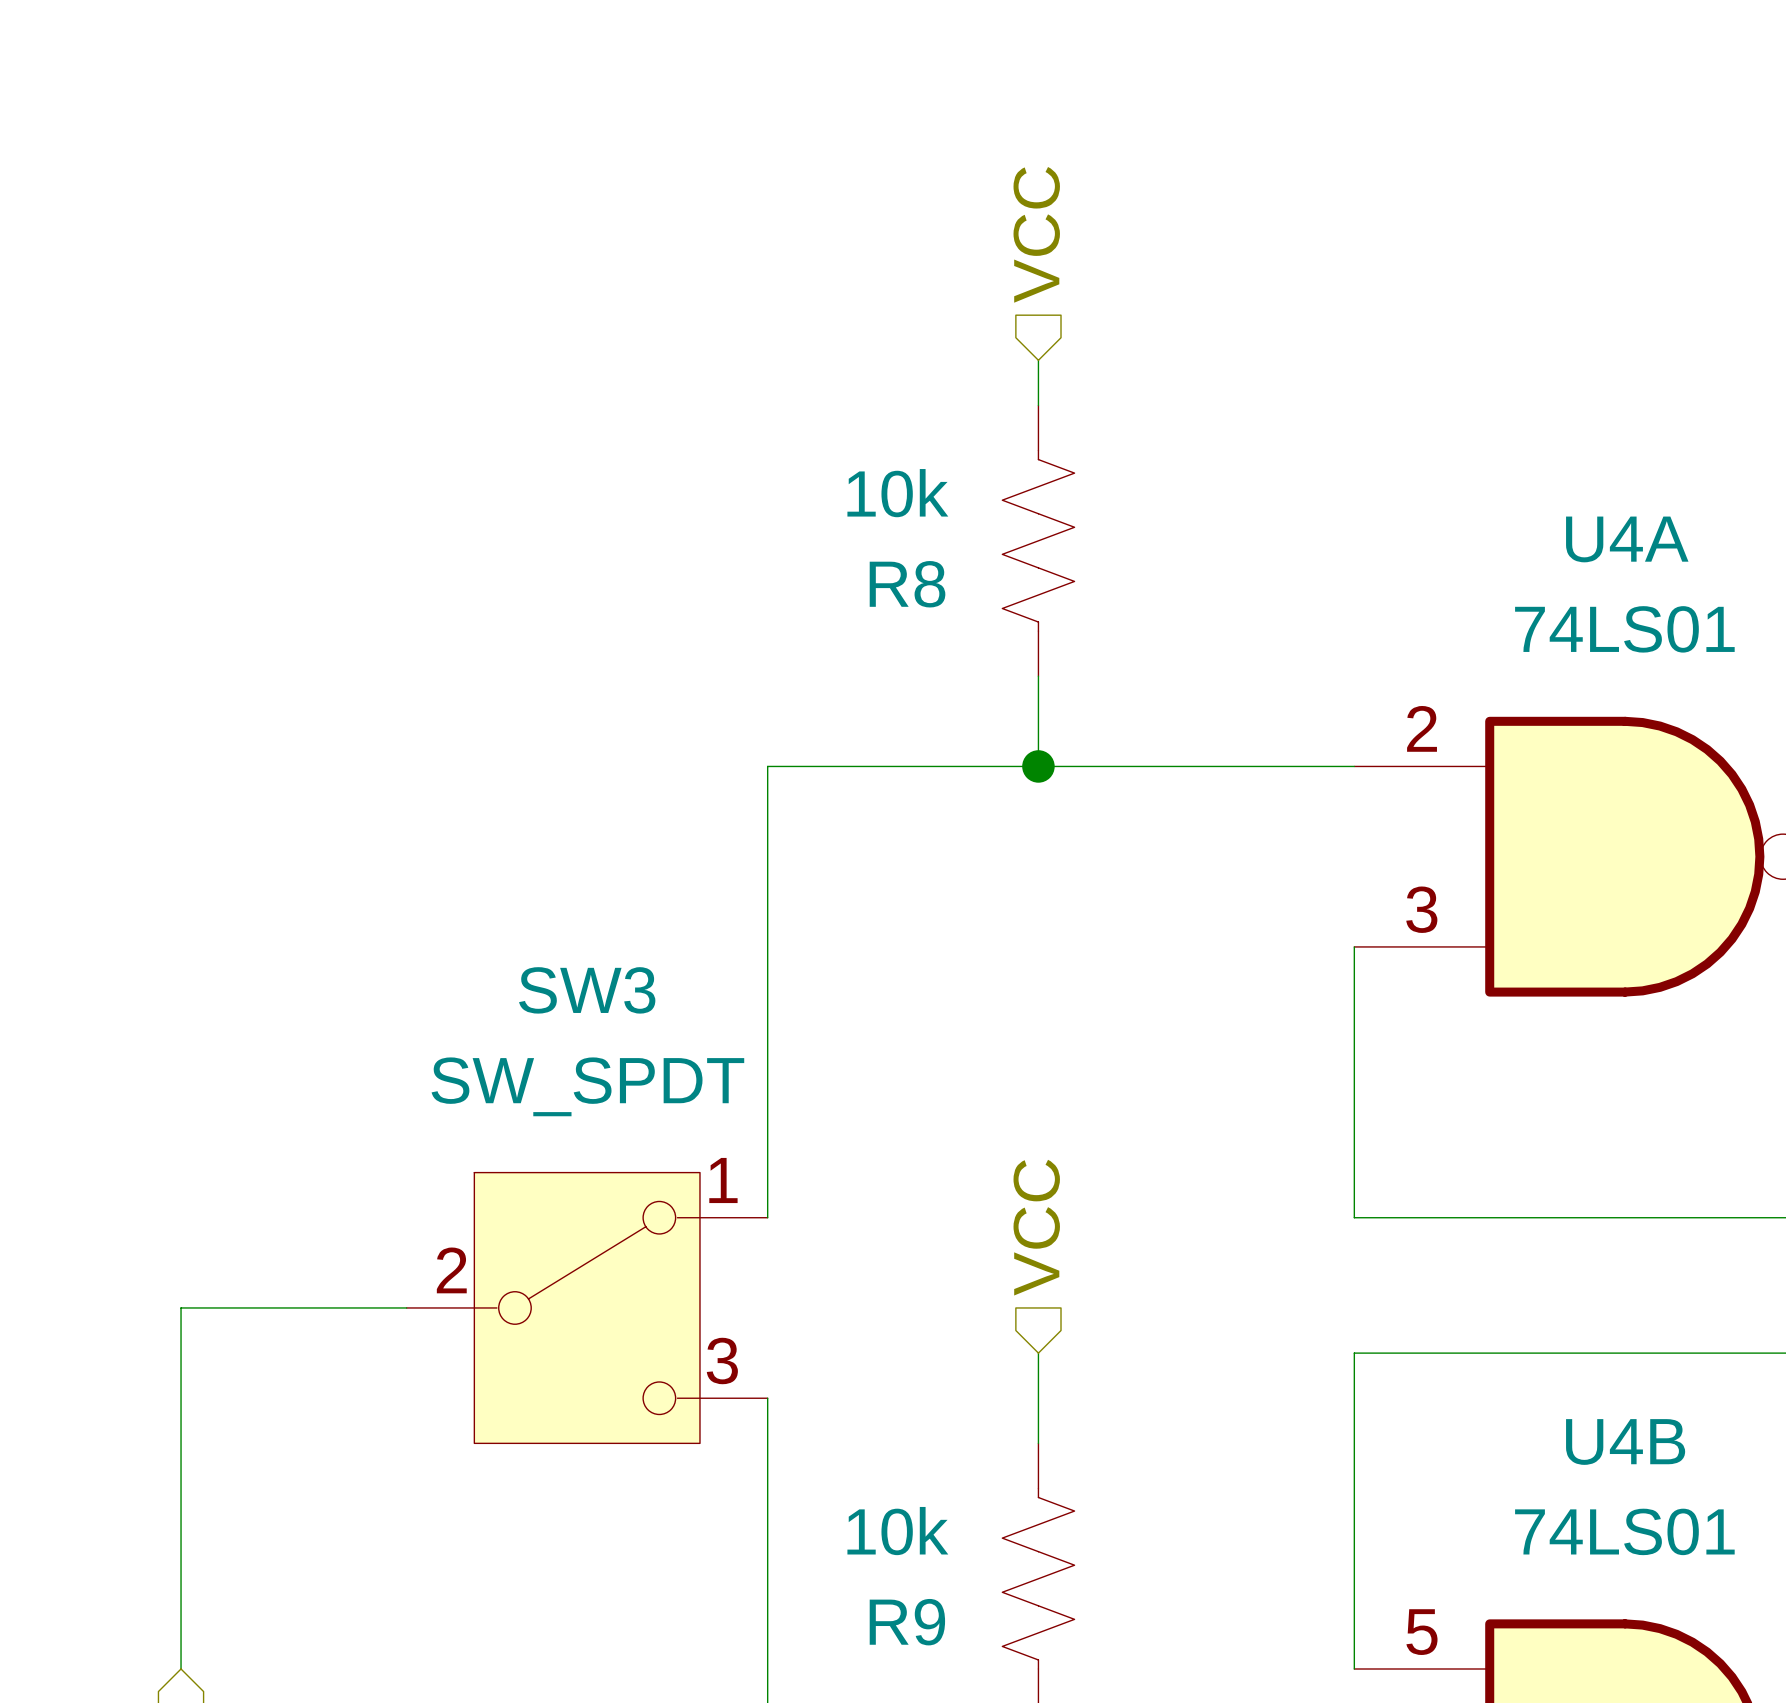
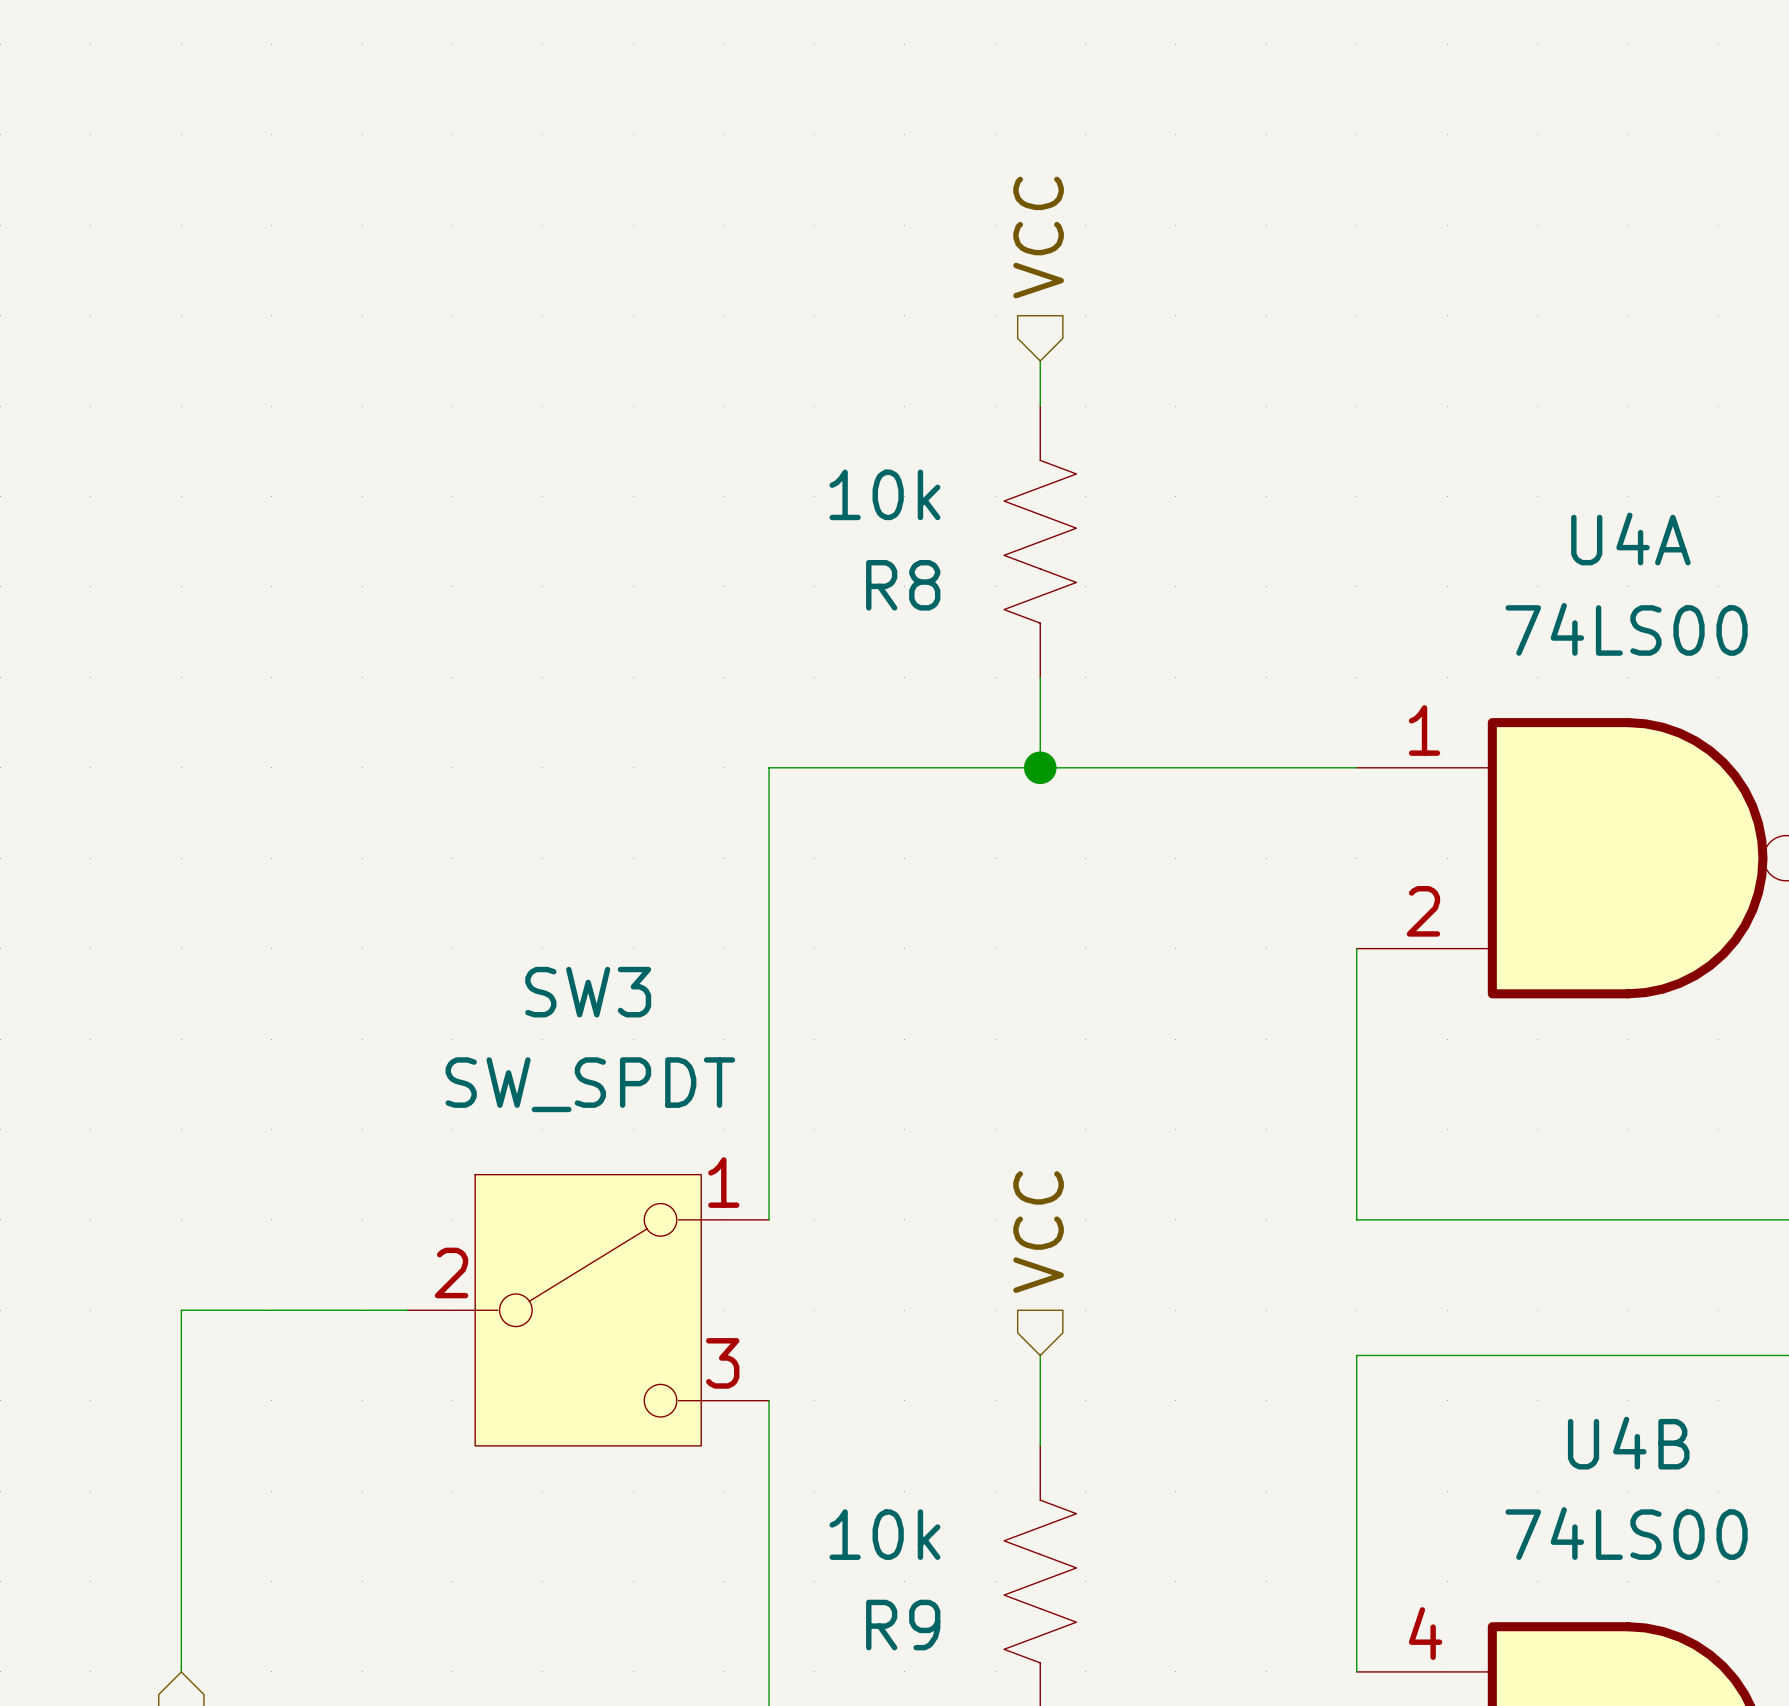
U4A value: 74LS01 (1624, 629) -> 74LS00 (1626, 629)
U4A pin number: 2 (1422, 728) -> 1 (1424, 730)
U4A pin number: 3 (1421, 909) -> 2 (1423, 911)
U4B value: 74LS01 (1624, 1531) -> 74LS00 (1626, 1533)
U4B pin number: 5 (1421, 1632) -> 4 (1425, 1633)

